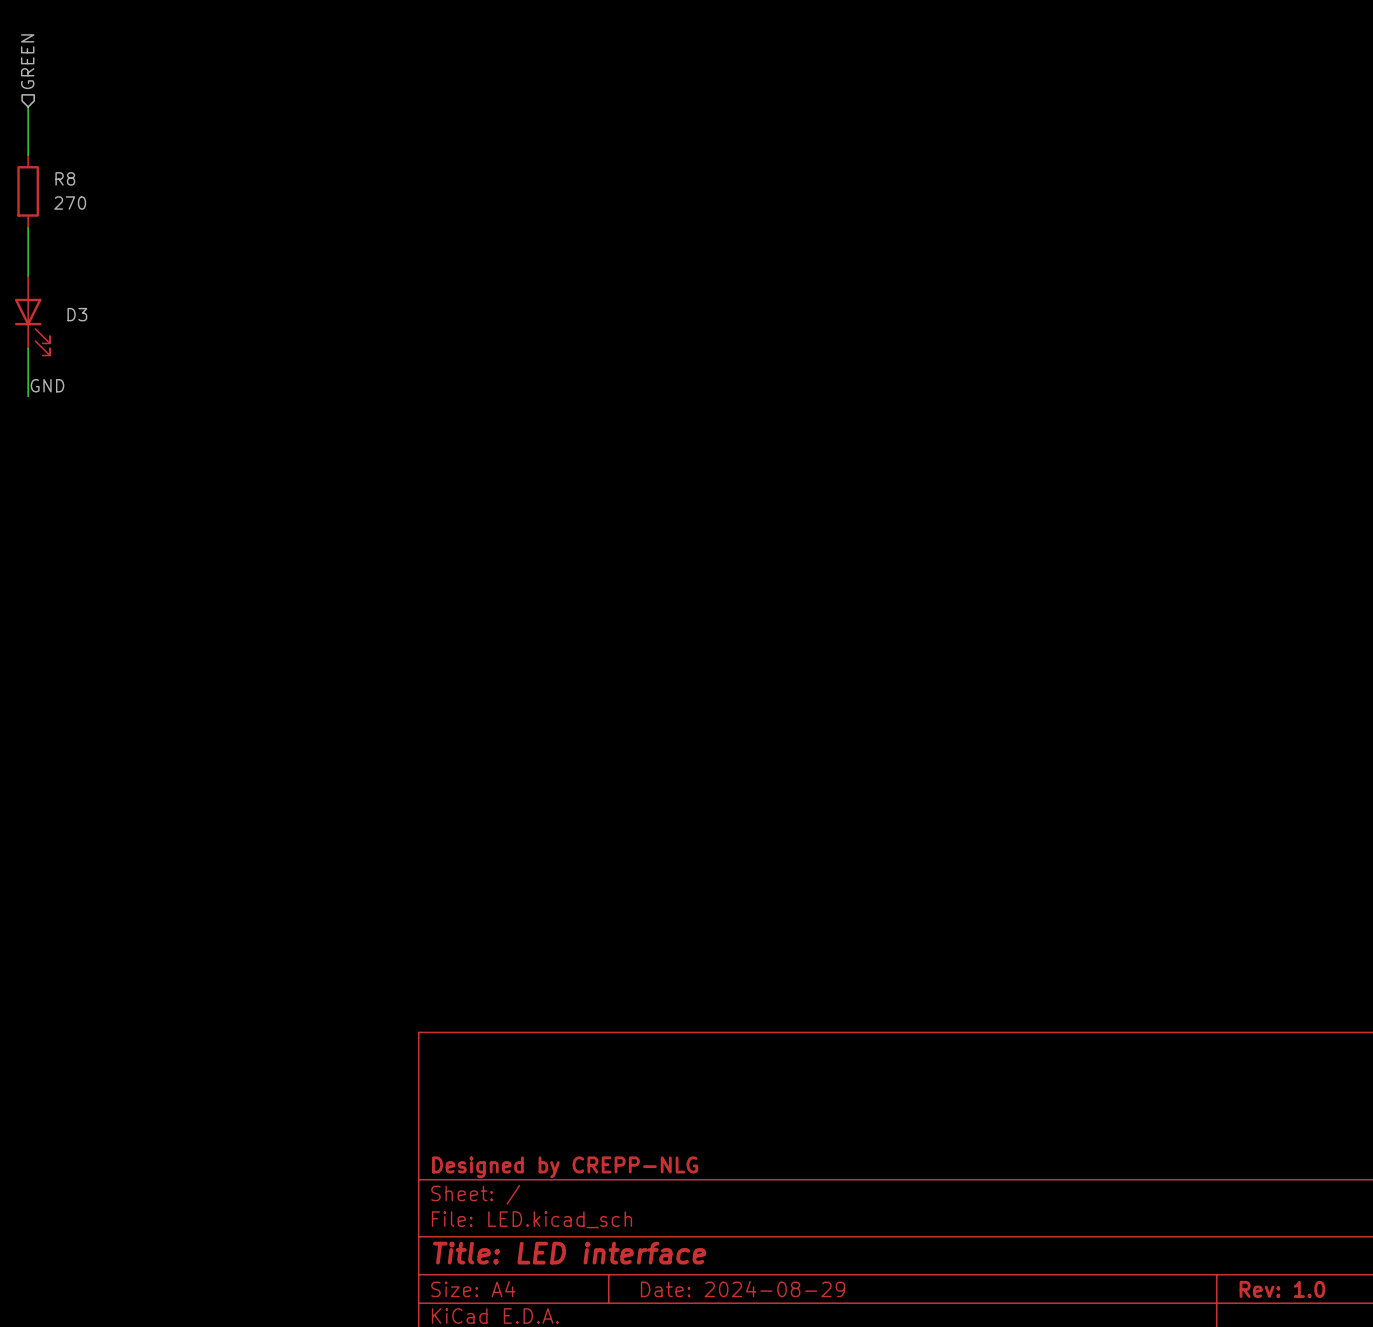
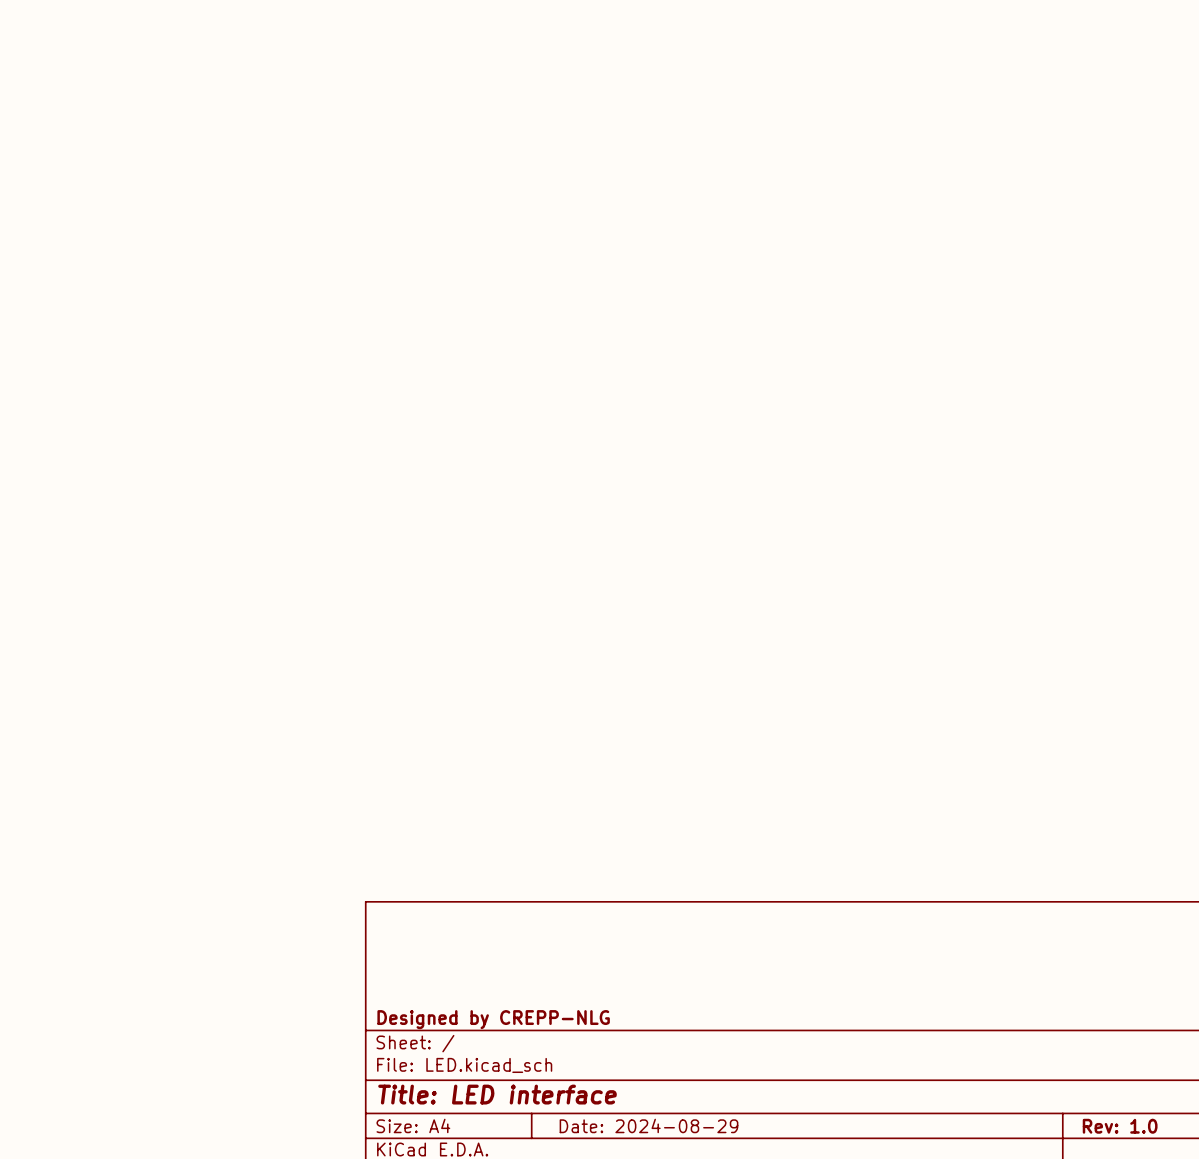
hierarchical label: GREEN (27, 61) -> none
wire: (28, 106) (28, 155) -> none
R8: 270 (28, 191) -> none
wire: (28, 227) (28, 275) -> none
D3: (32, 315) -> none
wire: (28, 348) (28, 396) -> none
label: GND (47, 385) -> none

